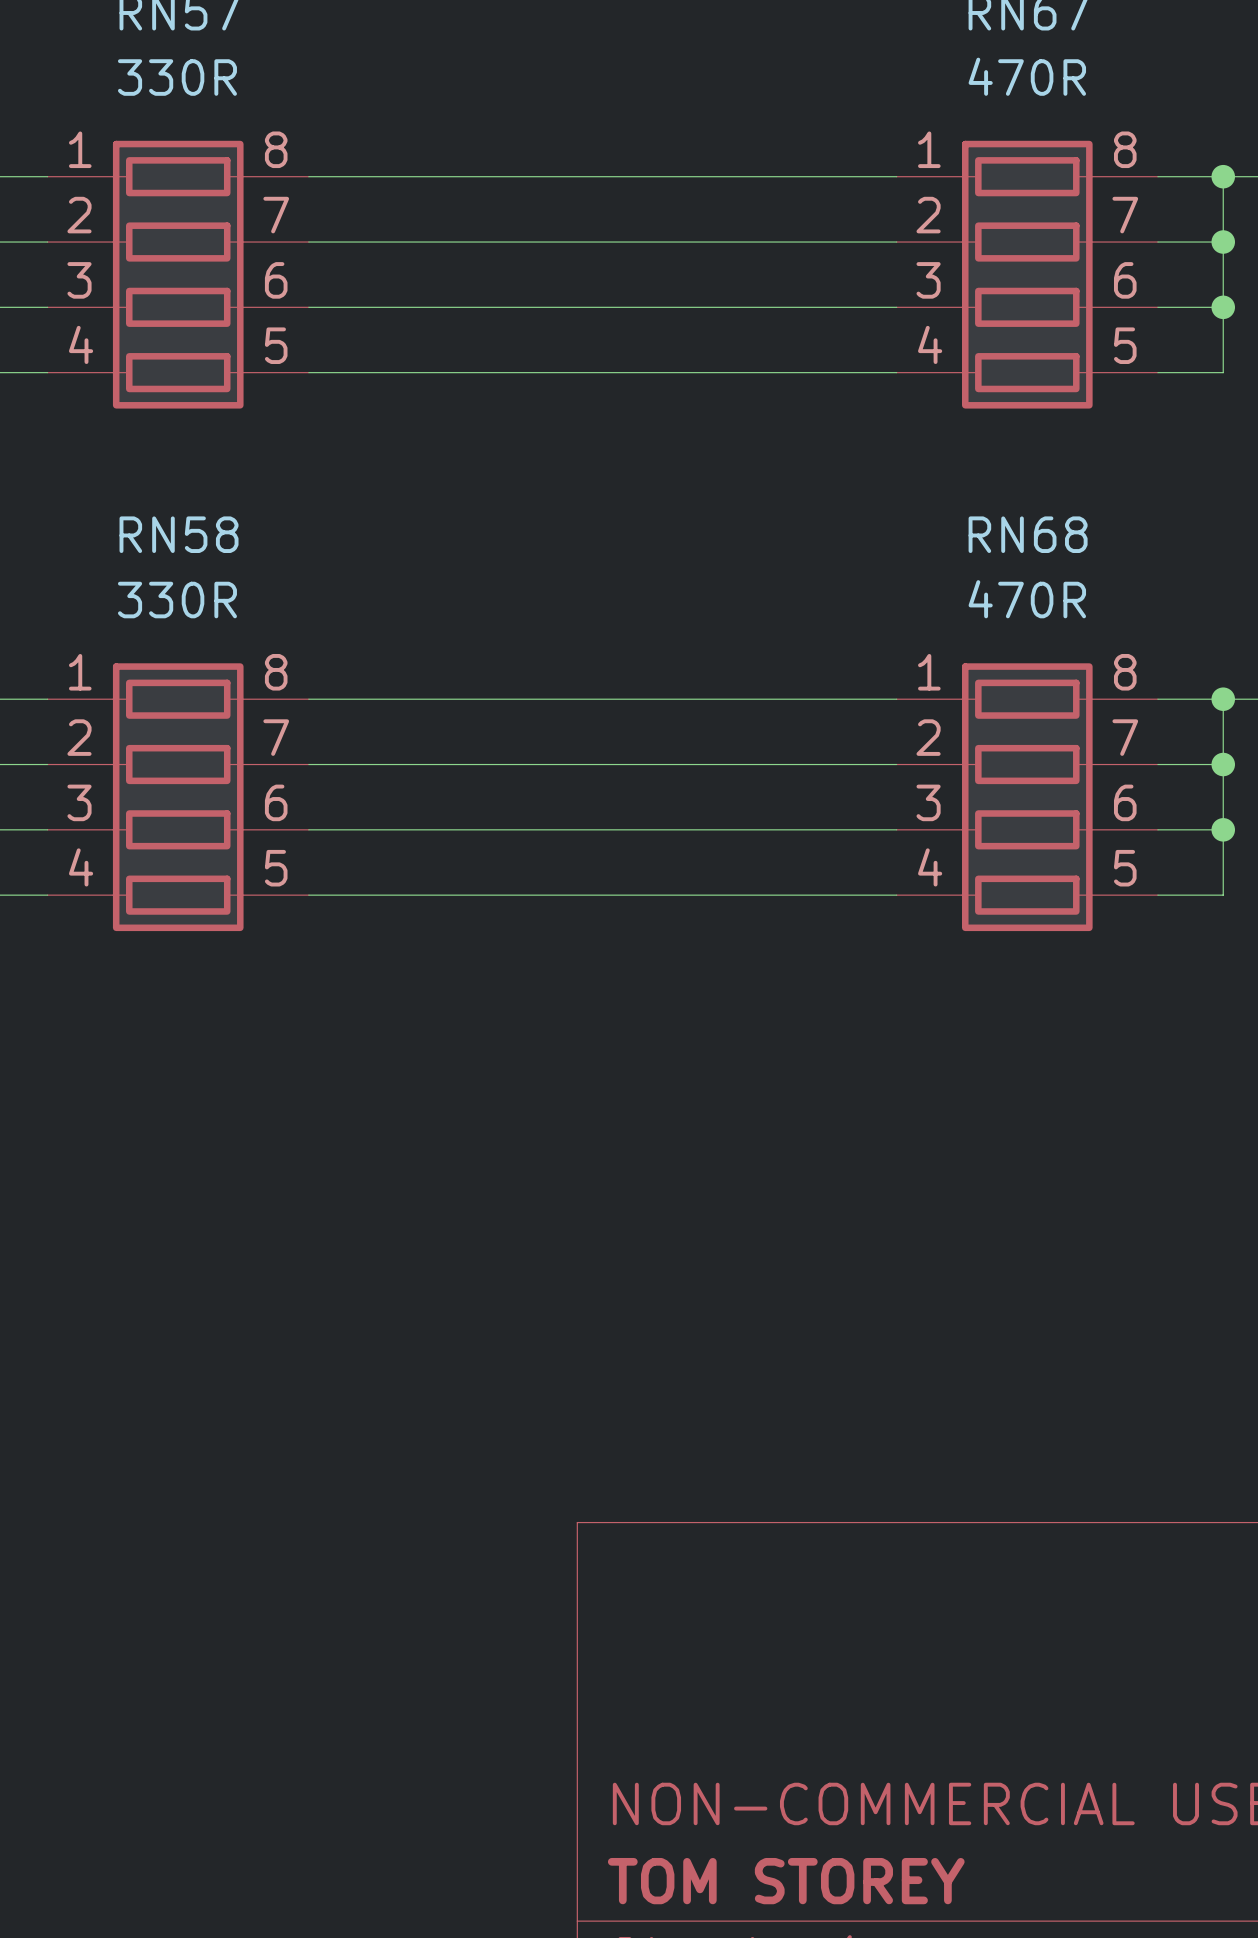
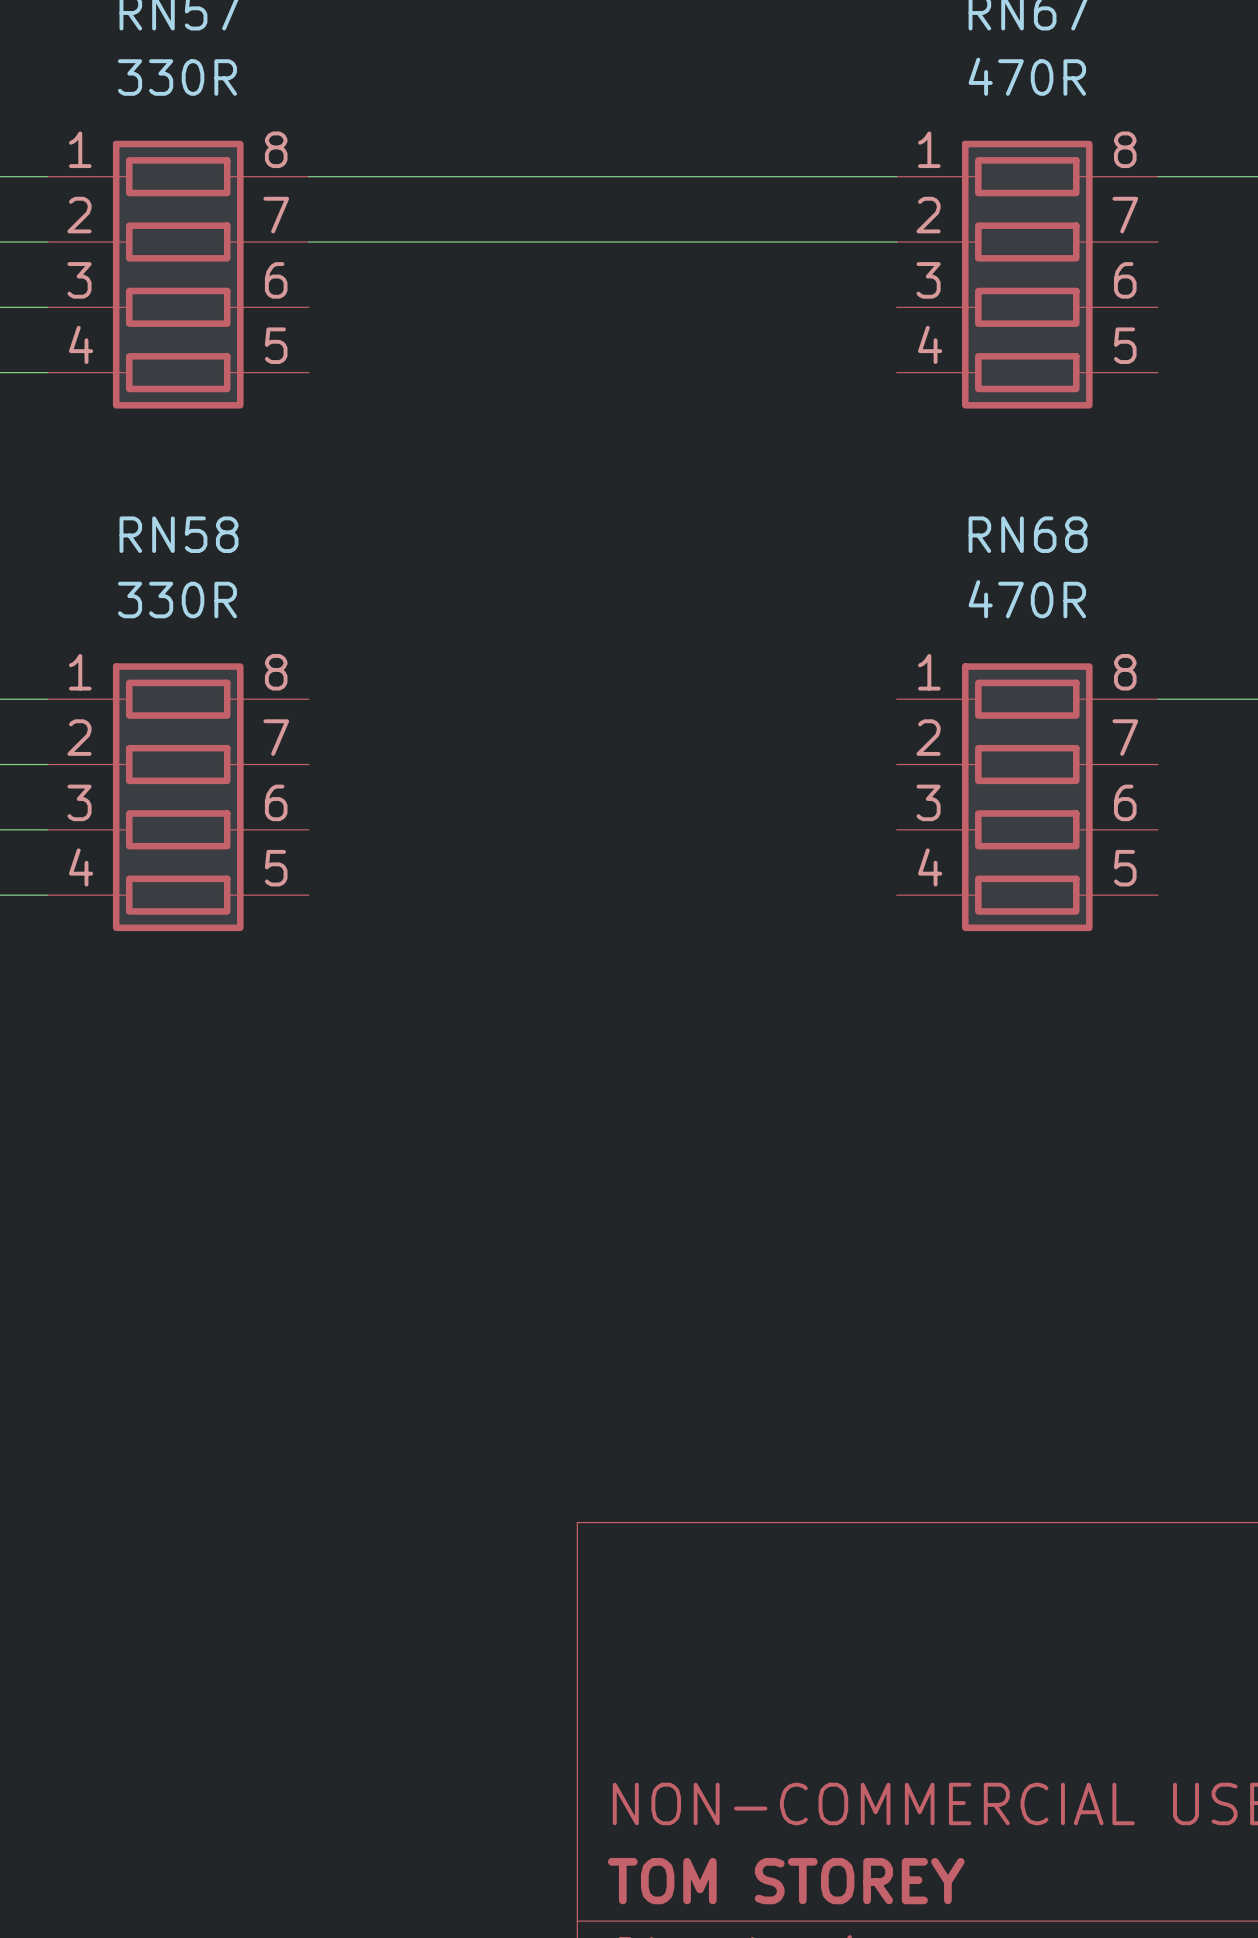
wire: (1223, 176) (1223, 372) (1157, 372) -> none
junction: (1223, 176) -> none
wire: (1157, 242) (1223, 242) -> none
junction: (1223, 242) -> none
wire: (308, 307) (896, 307) -> none
wire: (1157, 307) (1223, 307) -> none
junction: (1223, 307) -> none
wire: (308, 372) (896, 372) -> none
wire: (308, 699) (896, 699) -> none
wire: (1223, 699) (1223, 895) (1157, 895) -> none
junction: (1223, 699) -> none
wire: (308, 764) (896, 764) -> none
wire: (1157, 764) (1223, 764) -> none
junction: (1223, 764) -> none
wire: (308, 829) (896, 829) -> none
wire: (1157, 829) (1223, 829) -> none
junction: (1223, 829) -> none
wire: (308, 895) (896, 895) -> none

